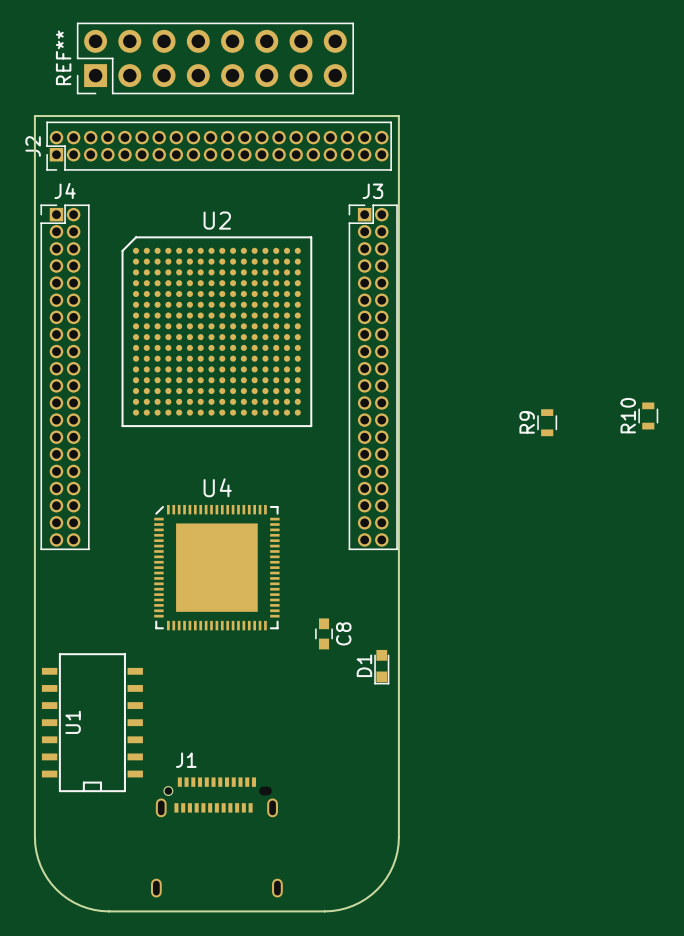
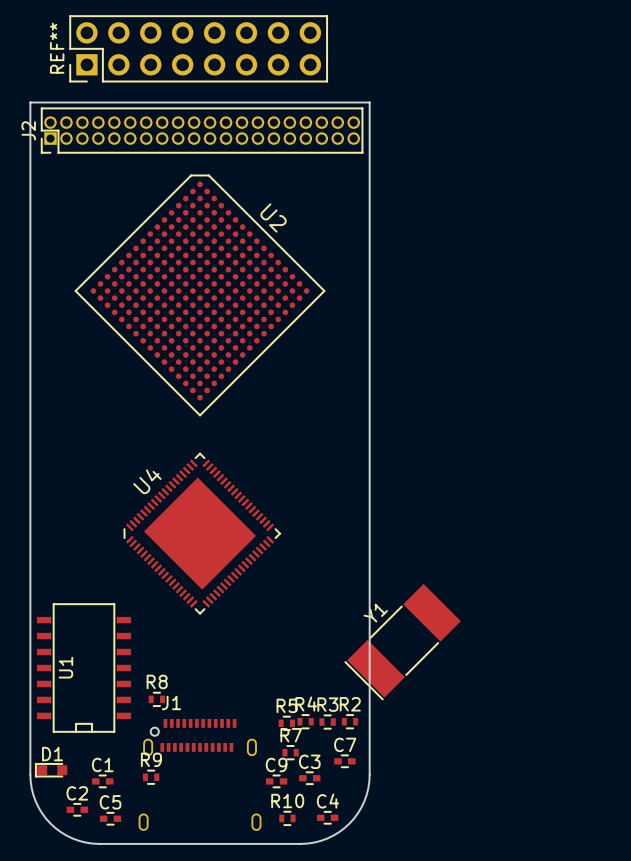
U2 rotation: 0° (216, 331) -> 45° clockwise (200, 295)
J4: (65, 377) -> none
J3: (373, 377) -> none
R10 footprint: [638, 402, 659, 430] -> [279, 811, 296, 826]
R9 footprint: [537, 409, 558, 437] -> [142, 769, 160, 785]
U4 rotation: 0° (216, 567) -> 45° counterclockwise (202, 533)
C8: (324, 633) -> none
D1 rotation: 0° (381, 667) -> 90° clockwise (51, 770)
D1 position: (381, 667) -> (51, 770)
Y1: none -> (402, 642)
R8: none -> (156, 699)
R4: none -> (305, 721)
R3: none -> (327, 722)
R2: none -> (349, 721)
R5: none -> (286, 723)
R7: none -> (290, 752)
C7: none -> (344, 761)
C3: none -> (309, 778)
C1: none -> (102, 781)
C9: none -> (276, 781)
C2: none -> (77, 809)
C4: none -> (327, 817)
C5: none -> (110, 818)

